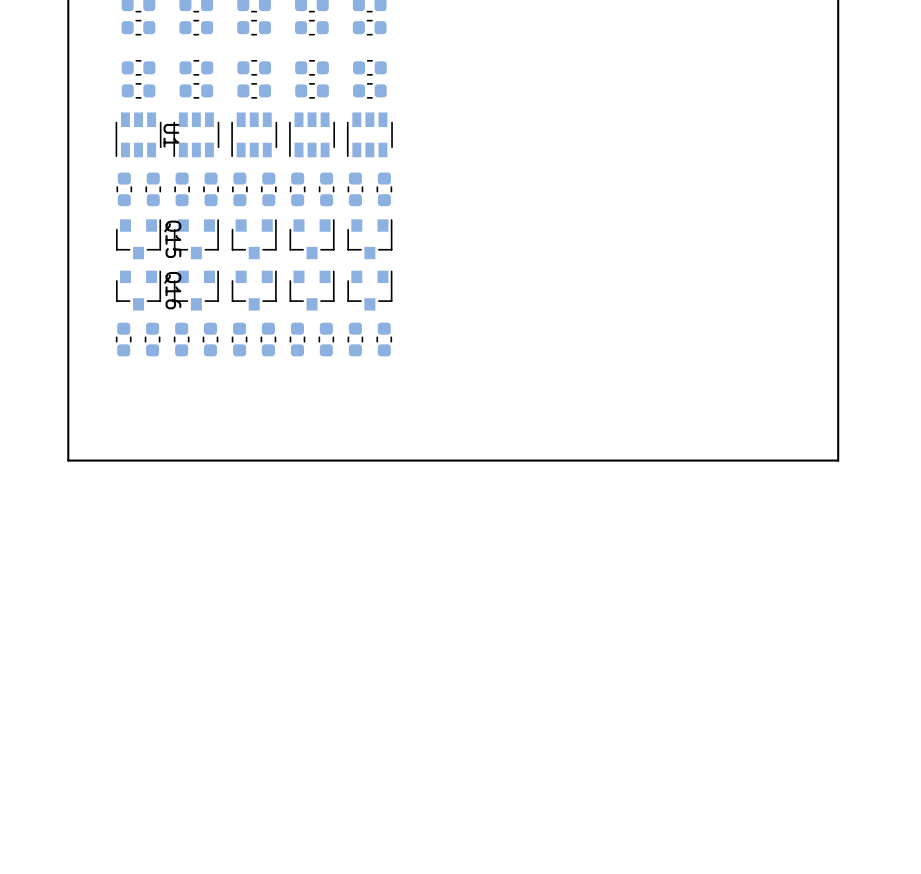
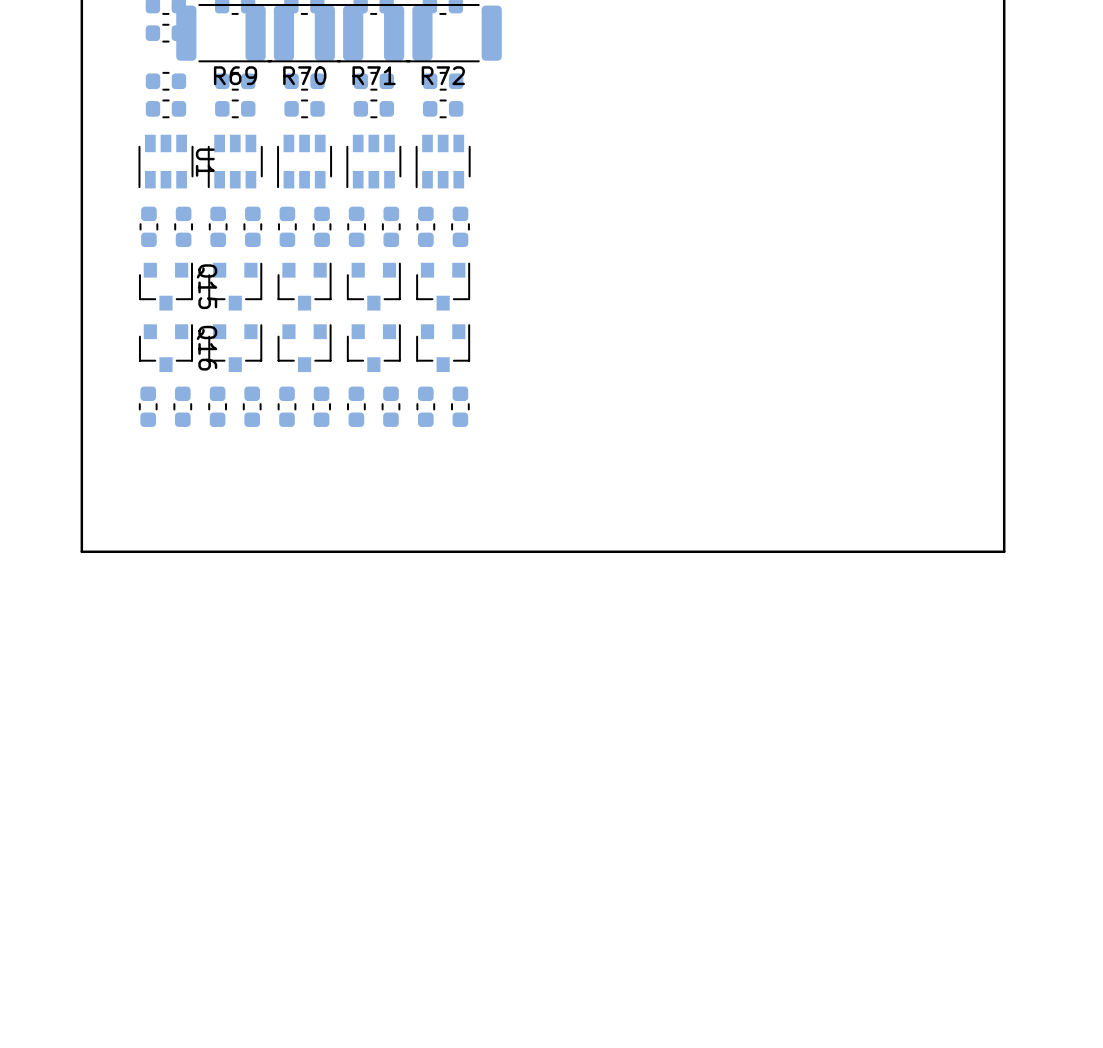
part: (196, 27) -> none
R69: none -> (235, 33)
part: (254, 27) -> none
R70: none -> (304, 33)
part: (311, 27) -> none
R71: none -> (373, 33)
part: (369, 27) -> none
R72: none -> (442, 33)

